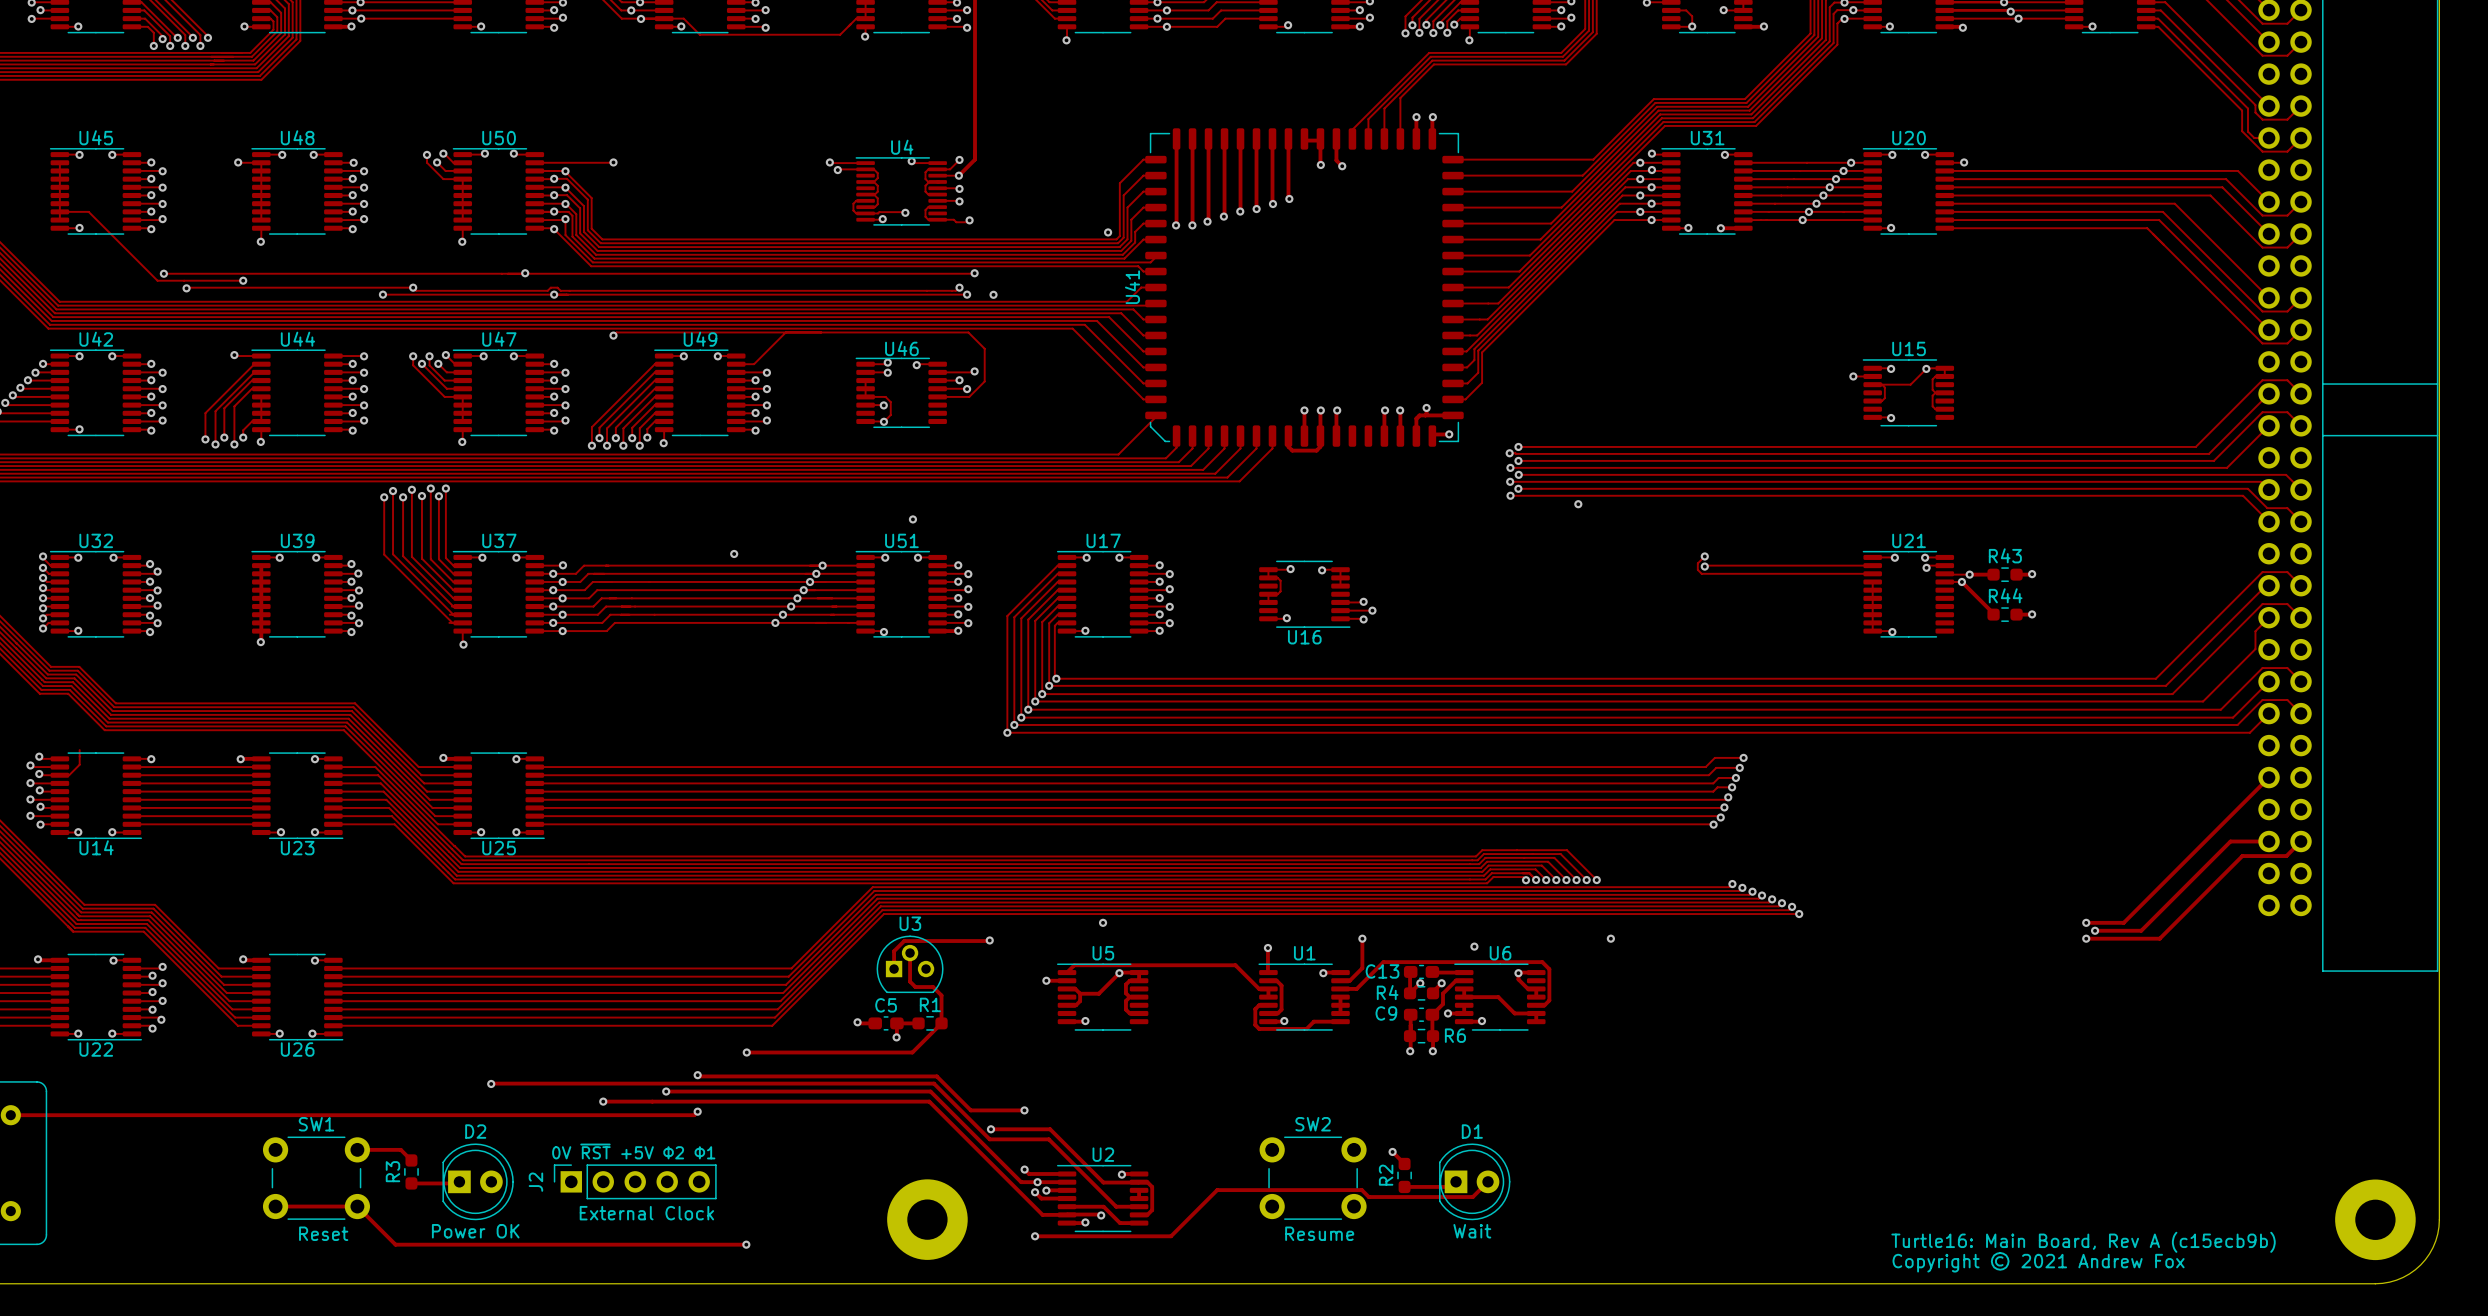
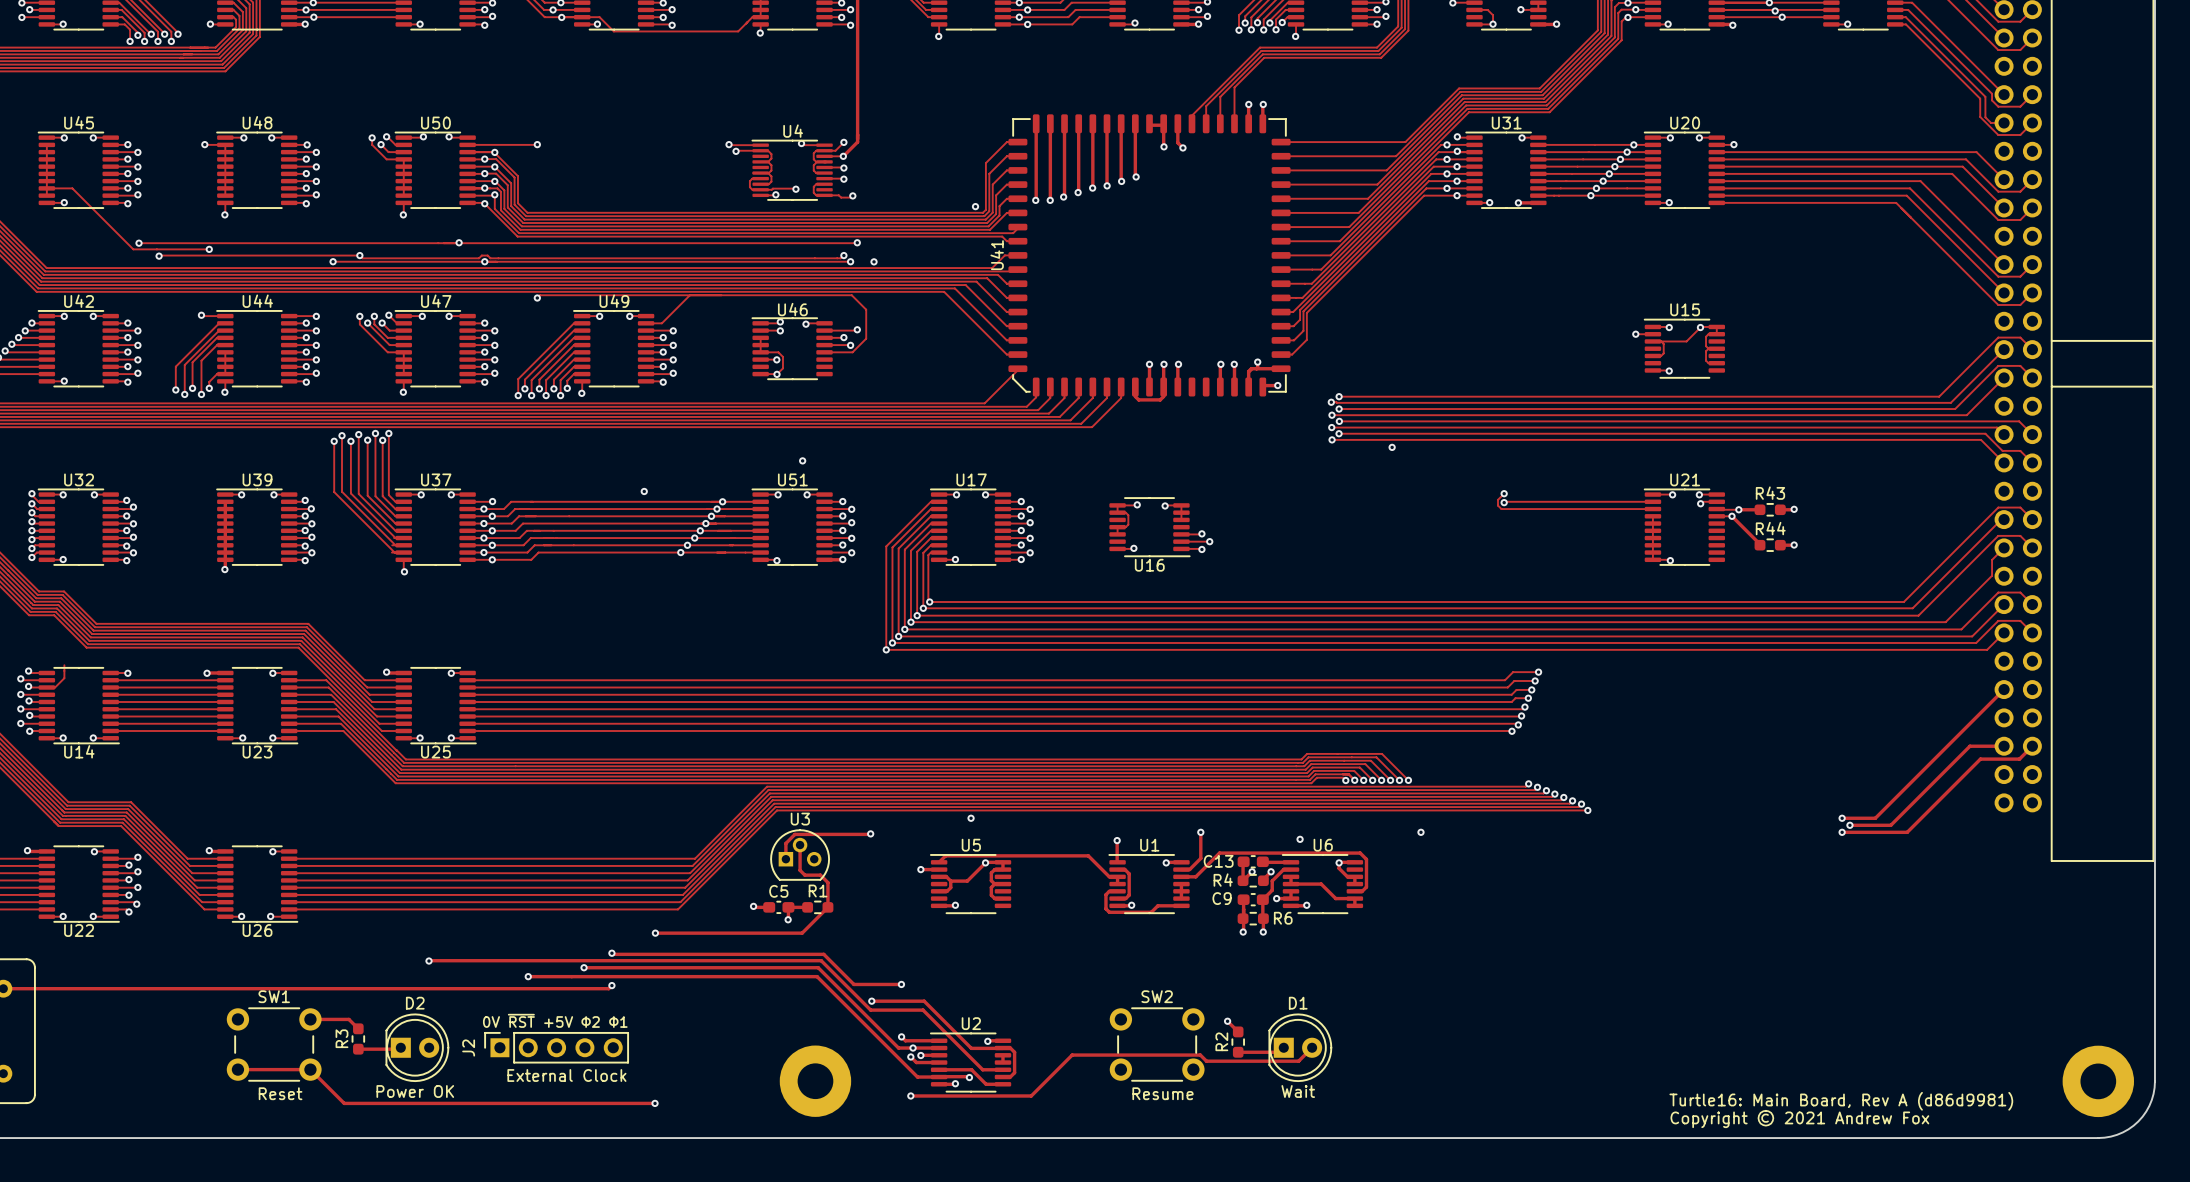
text: Turtle16: Main Board, Rev A (c15ecb9b) (2083, 1242) -> Turtle16: Main Board, Rev A (d86d9981) (1841, 1101)

